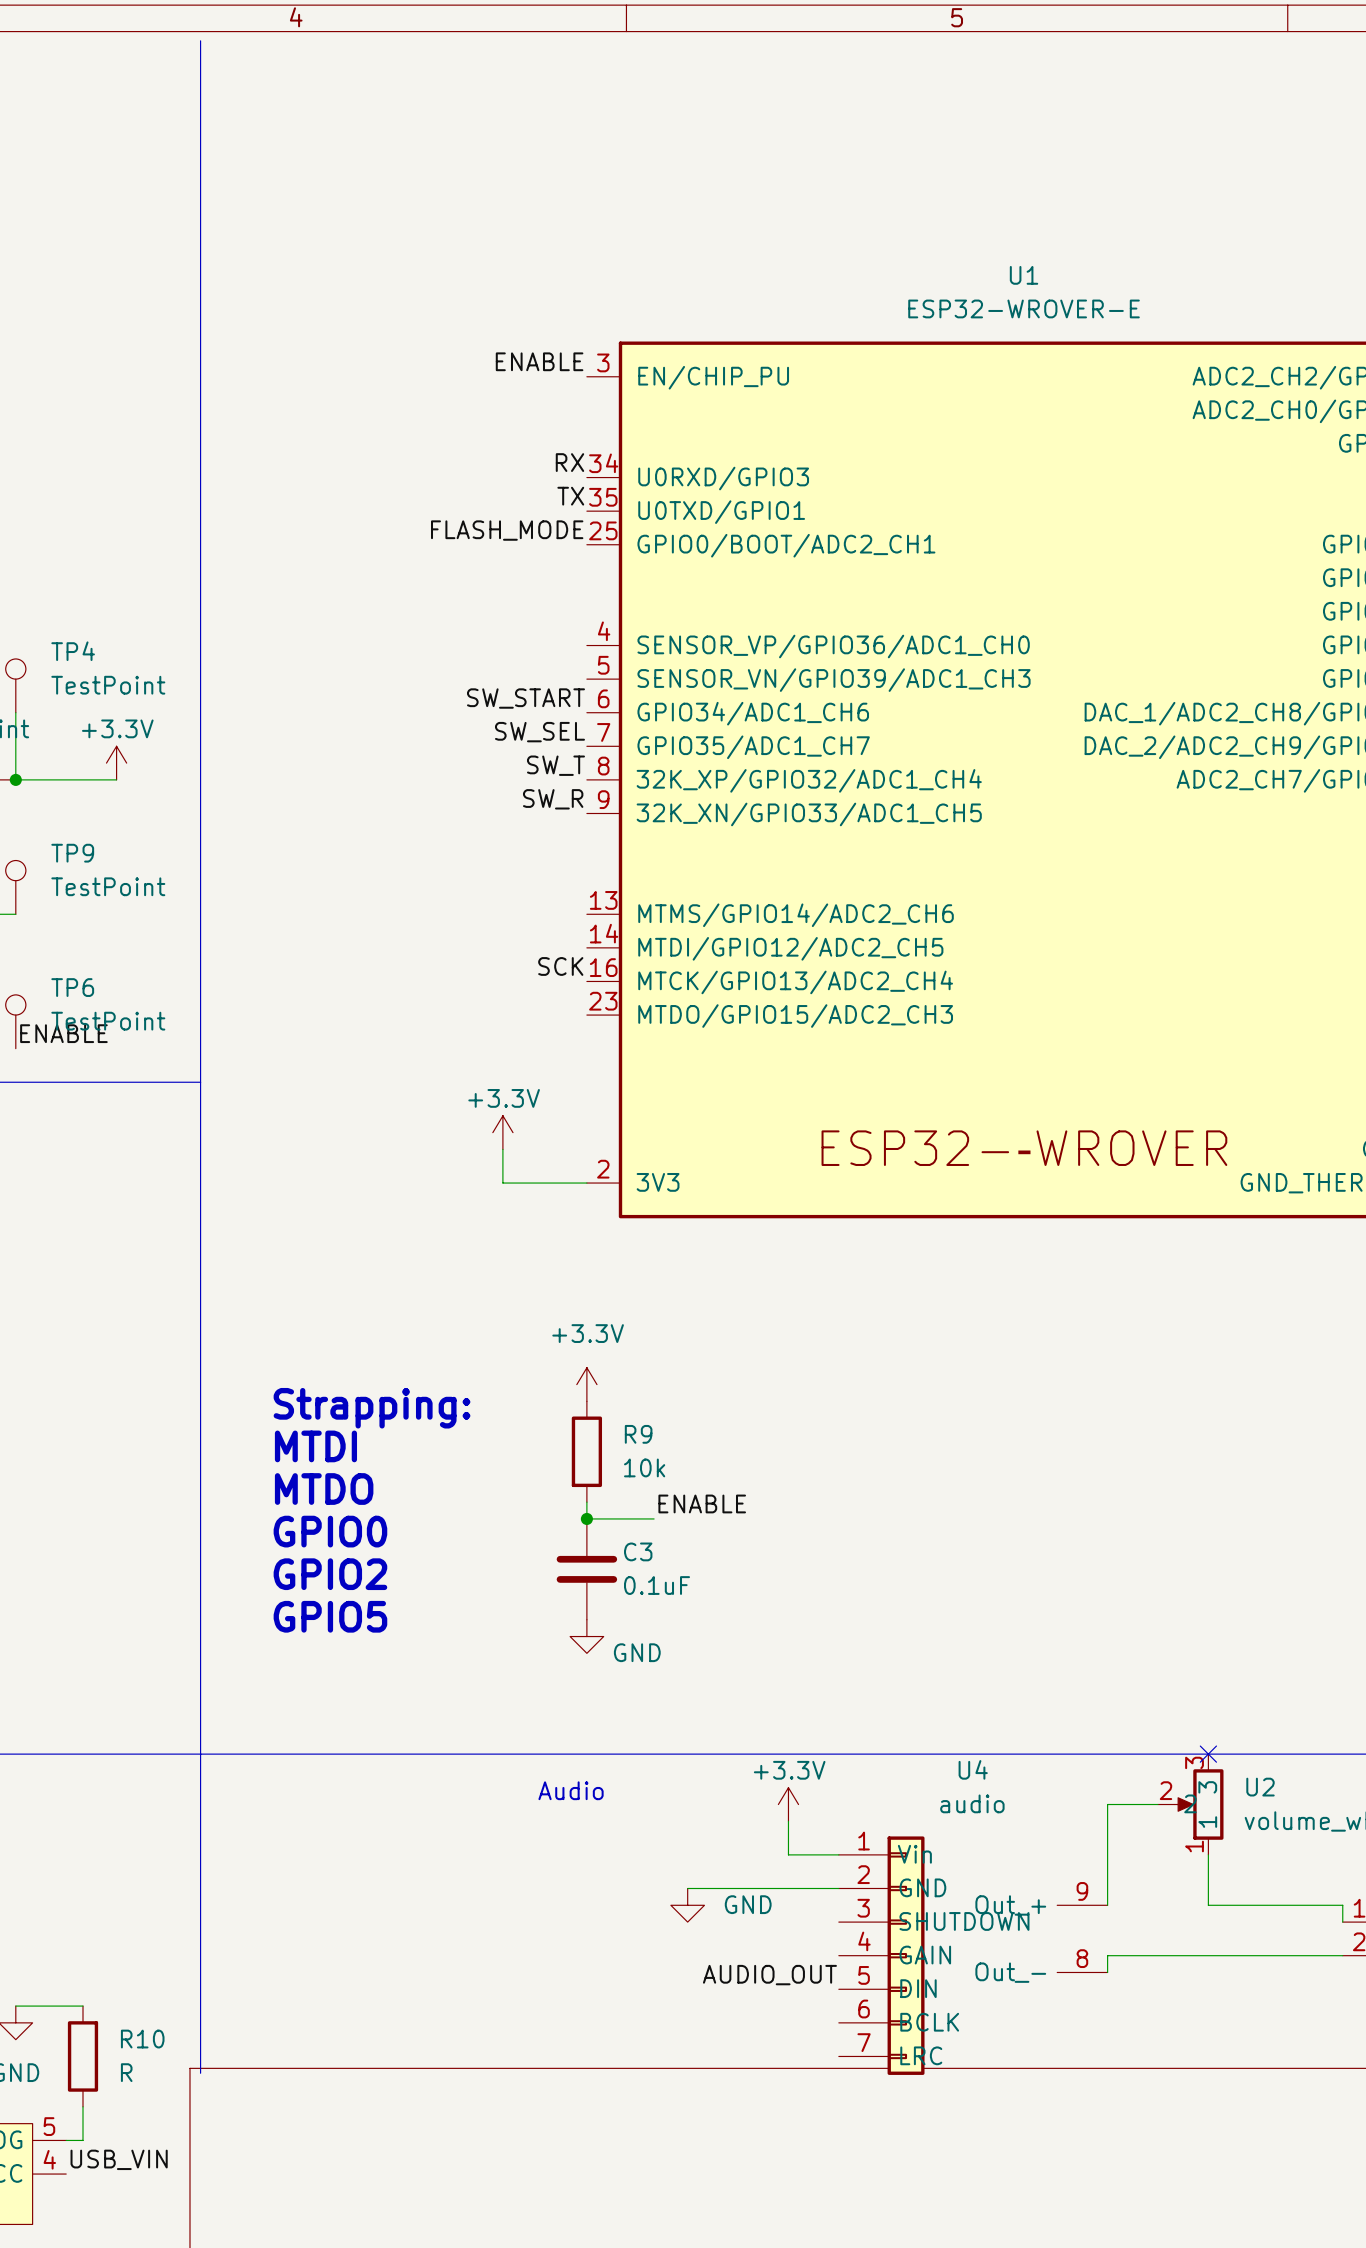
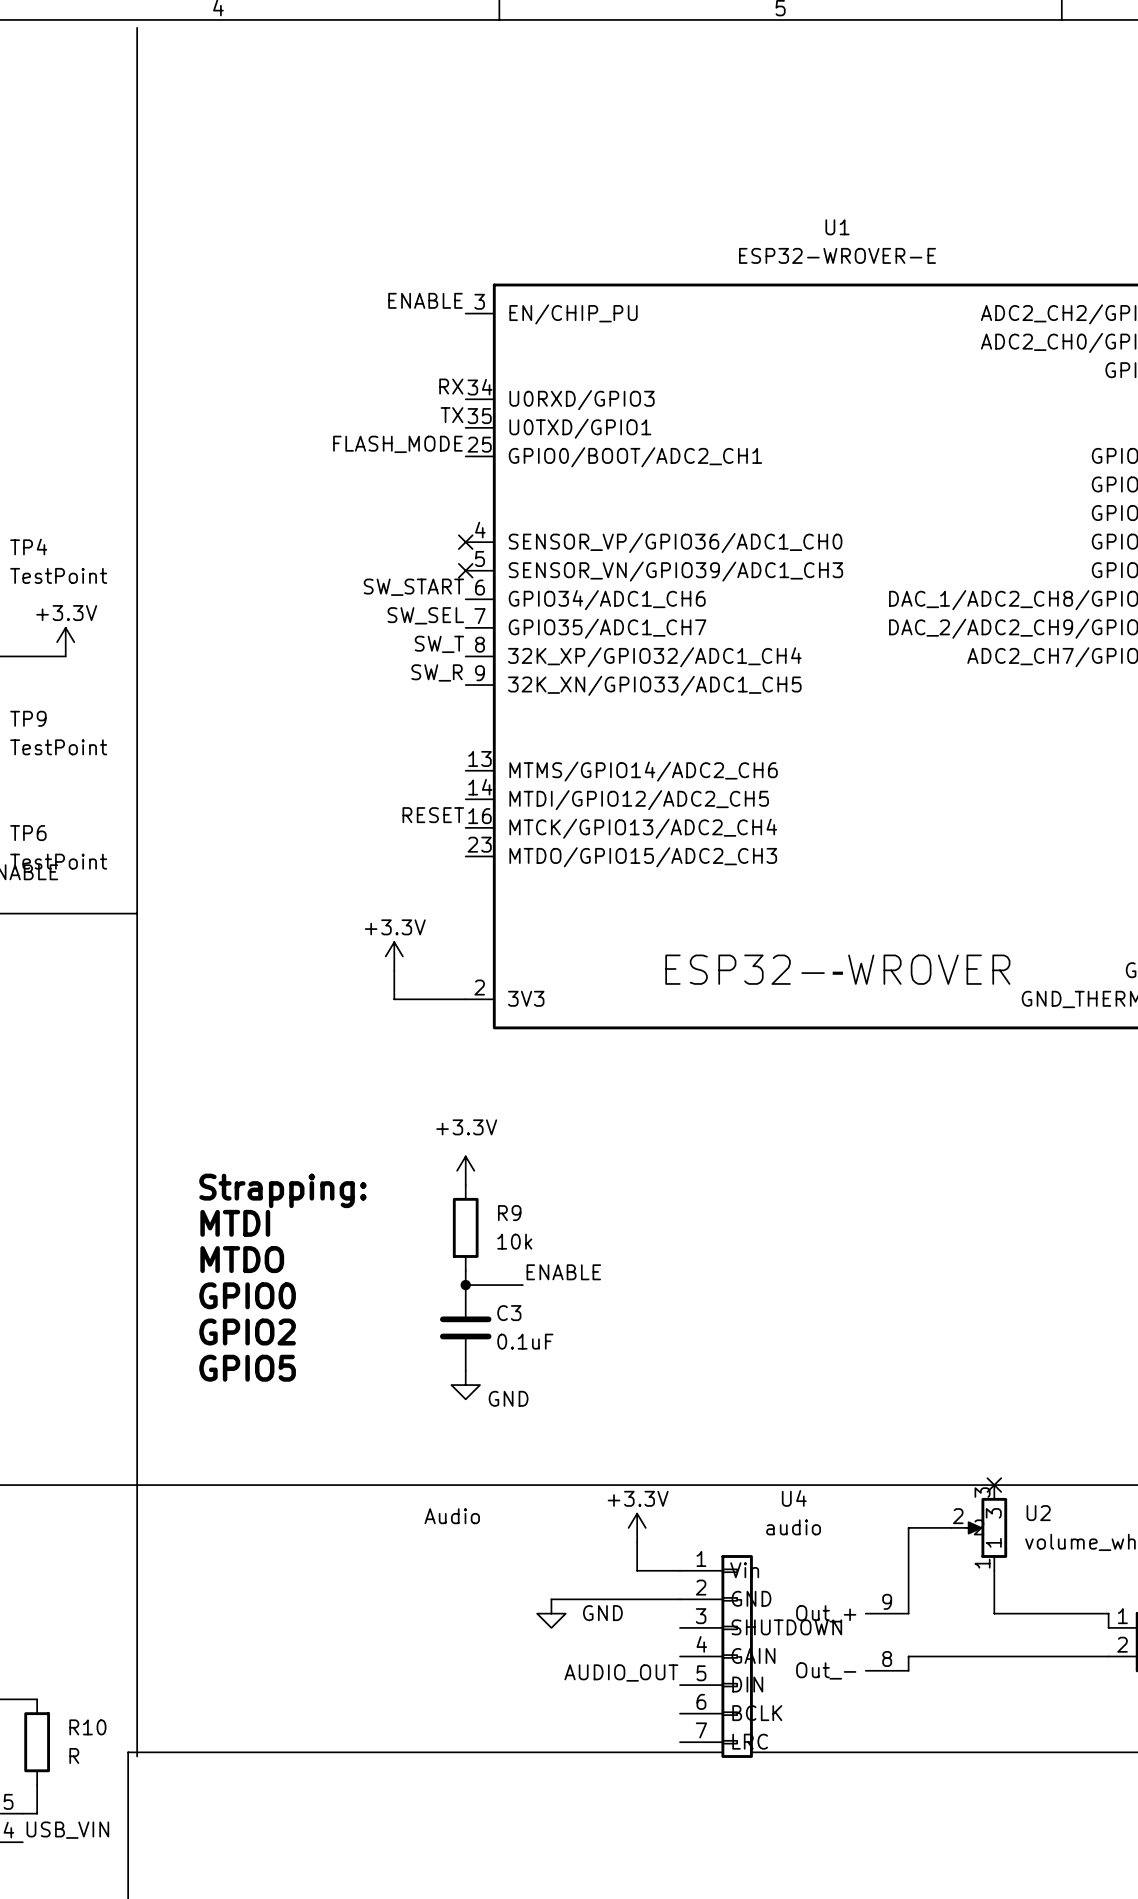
no-connect mark: none -> (465, 542)
no-connect mark: none -> (465, 570)
label: SCK (560, 966) -> RESET (433, 815)

